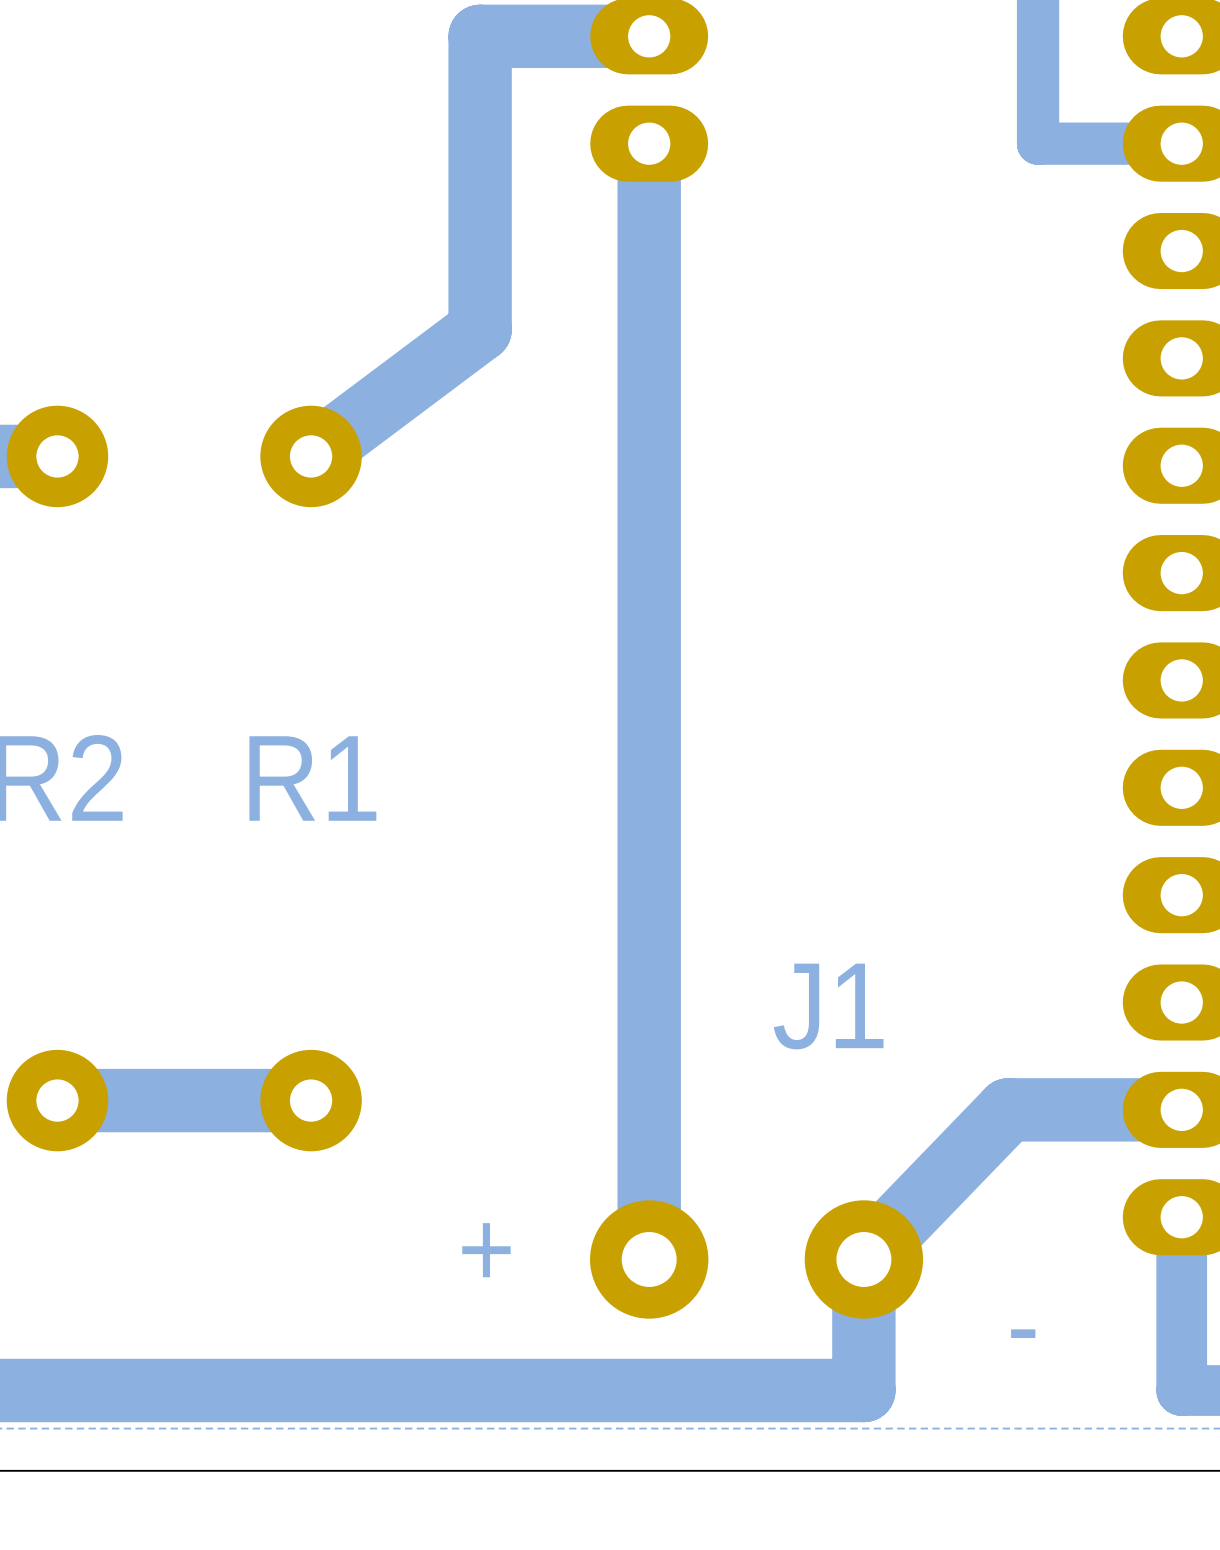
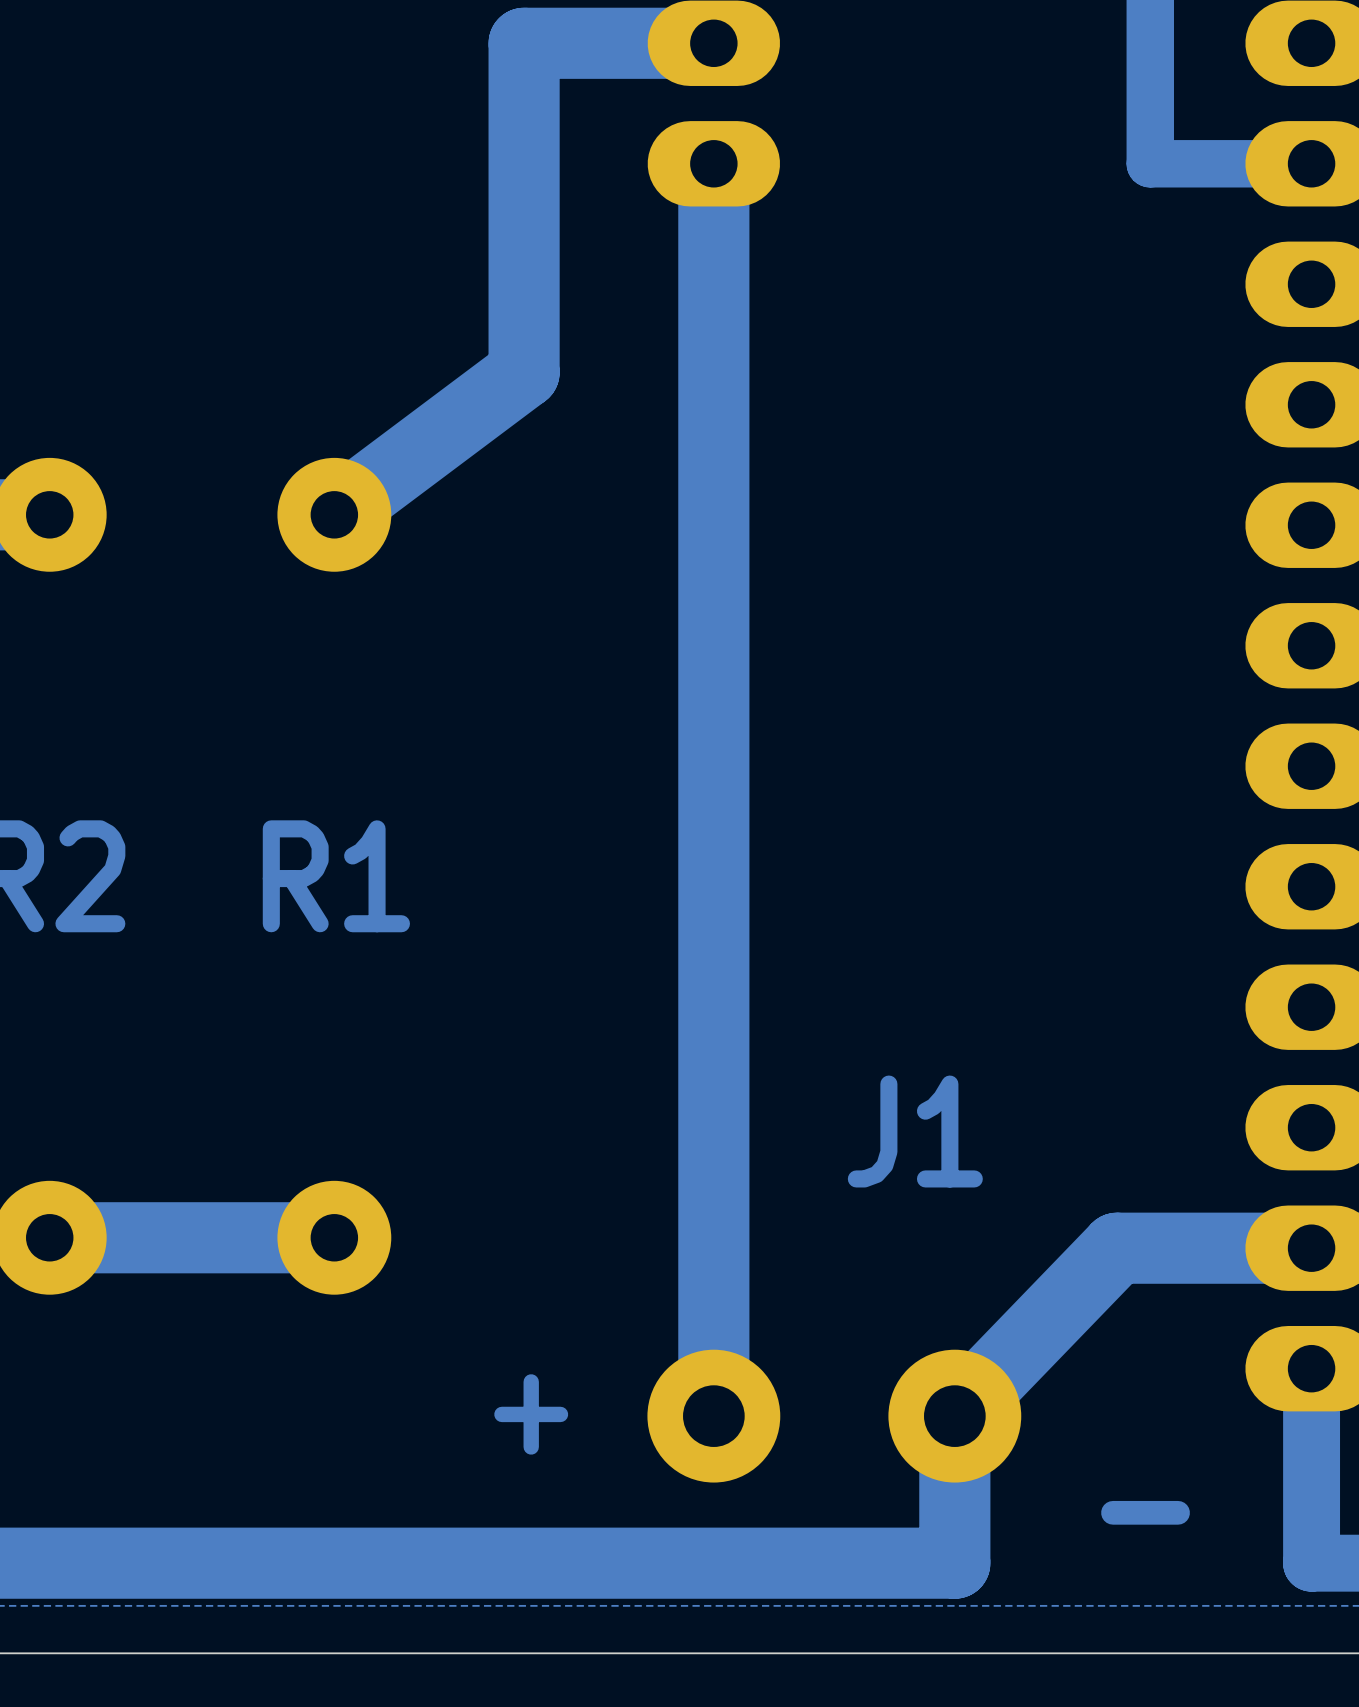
text position: - (1023, 1333) -> - (1145, 1512)

